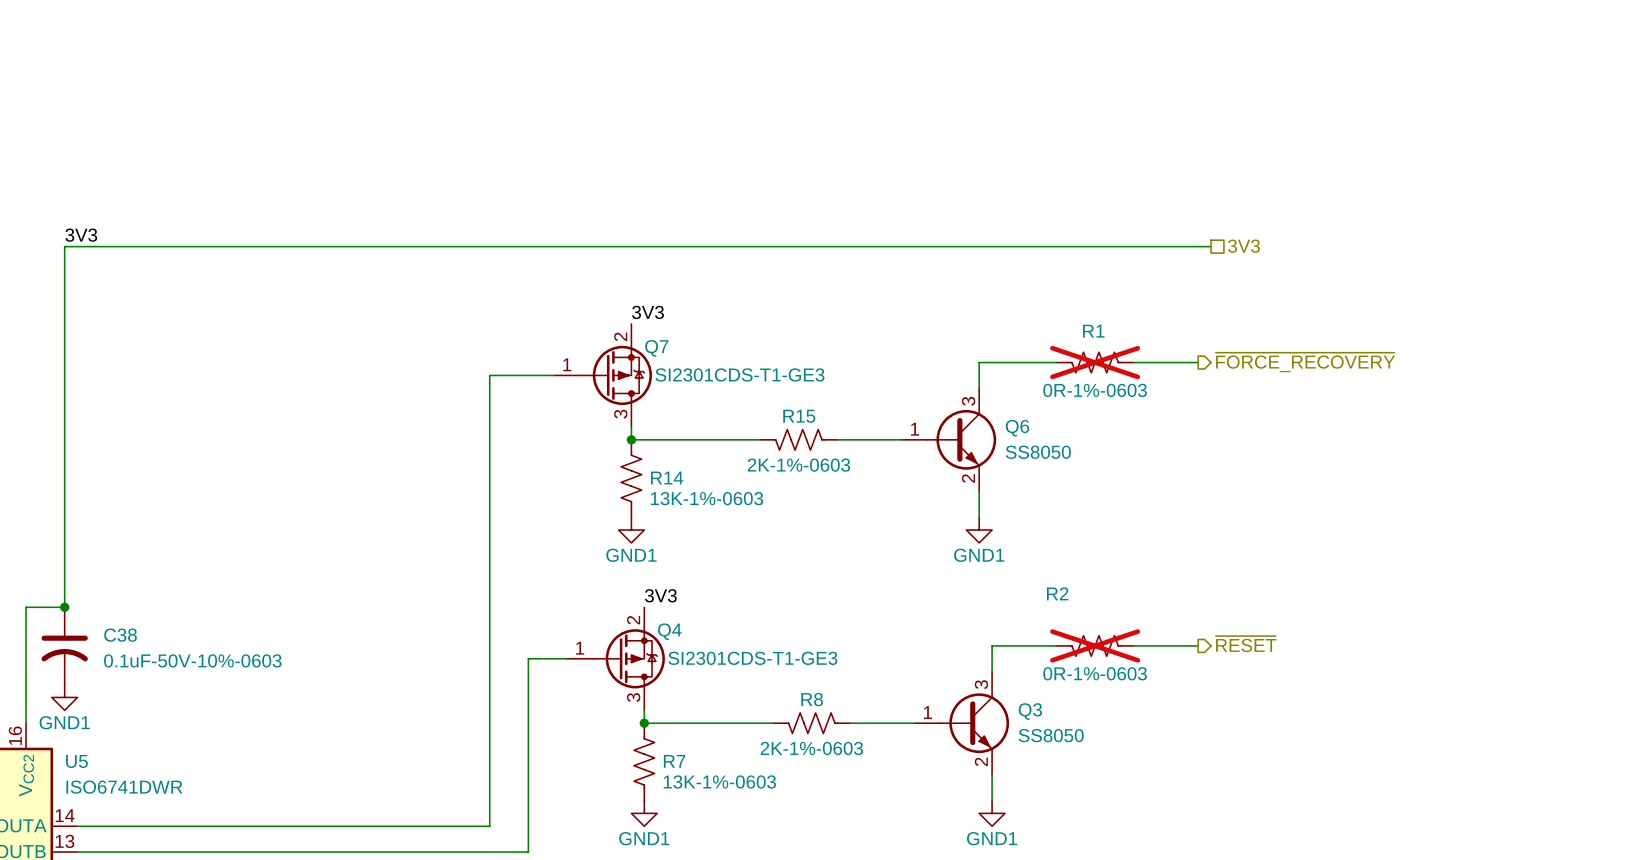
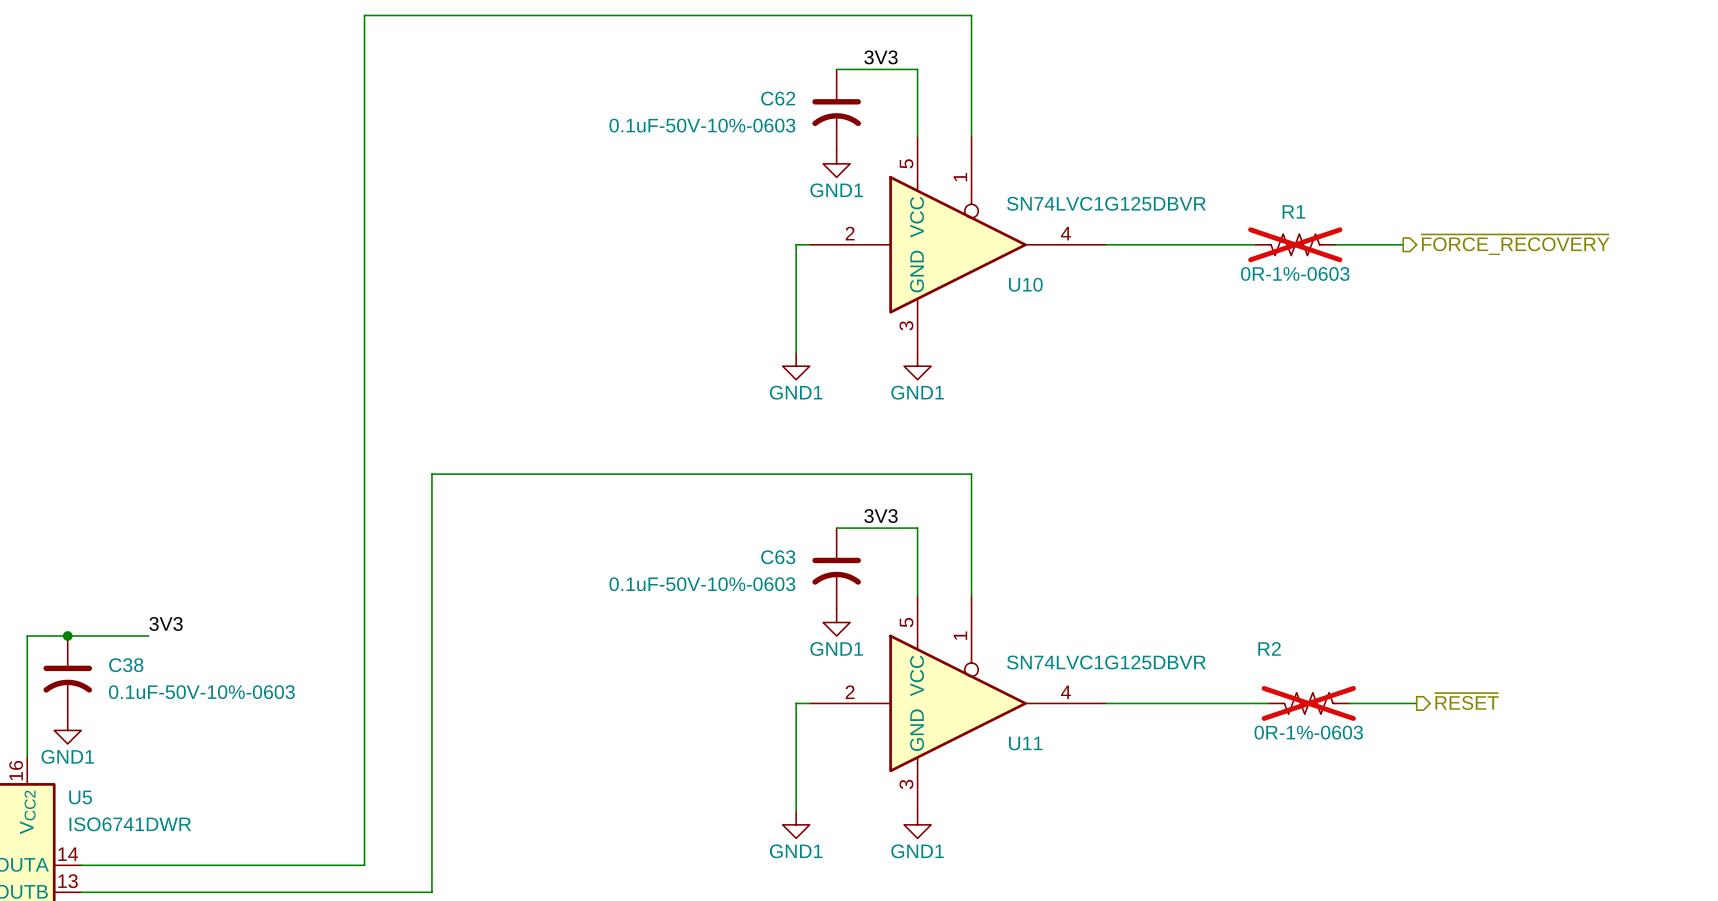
label: none -> 3V3 (881, 57)
wire: none -> (836, 69) (917, 69) (917, 136)
C62: none -> 0.1uF-50V-10%-0603 (836, 109)
power symbol: none -> GND1 (836, 163)
wire: none -> (809, 244) (796, 244) (796, 352)
U10: none -> SN74LVC1G125DBVR (958, 244)
wire: none -> (1106, 244) (1254, 244)
label: 3V3 (81, 235) -> none
wire: (1211, 246) (64, 246) (64, 607) -> (148, 636) (67, 636)
hierarchical label: 3V3 (1244, 246) -> none
label: 3V3 (648, 312) -> none
power symbol: none -> GND1 (796, 366)
power symbol: none -> GND1 (917, 366)
wire: (1056, 362) (979, 362) (979, 388) -> none
R1 position: (1095, 362) -> (1295, 244)
wire: (1133, 362) (1198, 362) -> (1335, 244) (1403, 244)
hierarchical label position: ~{FORCE_RECOVERY} (1305, 362) -> ~{FORCE_RECOVERY} (1515, 244)
wire: (554, 375) (489, 375) (489, 826) (348, 826) -> (971, 136) (971, 15) (364, 15) (364, 865)
Q7: SI2301CDS-T1-GE3 (603, 375) -> none
wire: (631, 426) (631, 439) (760, 439) -> none
junction: (631, 439) -> none
R15: 2K-1%-0603 (798, 439) -> none
wire: (837, 439) (901, 439) -> none
Q6: SS8050 (949, 439) -> none
R14: 13K-1%-0603 (631, 478) -> none
wire: (979, 491) (979, 517) -> none
label: none -> 3V3 (881, 516)
wire: none -> (836, 528) (917, 528) (917, 595)
power symbol: GND1 (631, 530) -> none
power symbol: GND1 (979, 530) -> none
C63: none -> 0.1uF-50V-10%-0603 (836, 568)
power symbol: none -> GND1 (836, 622)
label: none -> 3V3 (166, 623)
label: 3V3 (660, 595) -> none
hierarchical label position: ~{RESET} (1246, 644) -> ~{RESET} (1466, 701)
wire: (1056, 645) (992, 645) (992, 671) -> none
R2 position: (1095, 645) -> (1308, 703)
wire: (1133, 645) (1198, 645) -> (1349, 703) (1416, 703)
wire: (567, 658) (528, 658) (528, 852) (412, 852) -> (971, 595) (971, 474) (431, 474) (431, 892)
Q4: SI2301CDS-T1-GE3 (615, 658) -> none
wire: none -> (809, 703) (796, 703) (796, 811)
U11: none -> SN74LVC1G125DBVR (958, 703)
wire: none -> (1106, 703) (1268, 703)
wire: (644, 710) (644, 723) (773, 723) -> none
junction: (644, 723) -> none
R8: 2K-1%-0603 (811, 723) -> none
wire: (850, 723) (914, 723) -> none
Q3: SS8050 (961, 723) -> none
R7: 13K-1%-0603 (644, 761) -> none
wire: (992, 774) (992, 800) -> none
power symbol: none -> GND1 (796, 824)
power symbol: none -> GND1 (917, 824)
power symbol: GND1 (644, 813) -> none
power symbol: GND1 (992, 813) -> none

